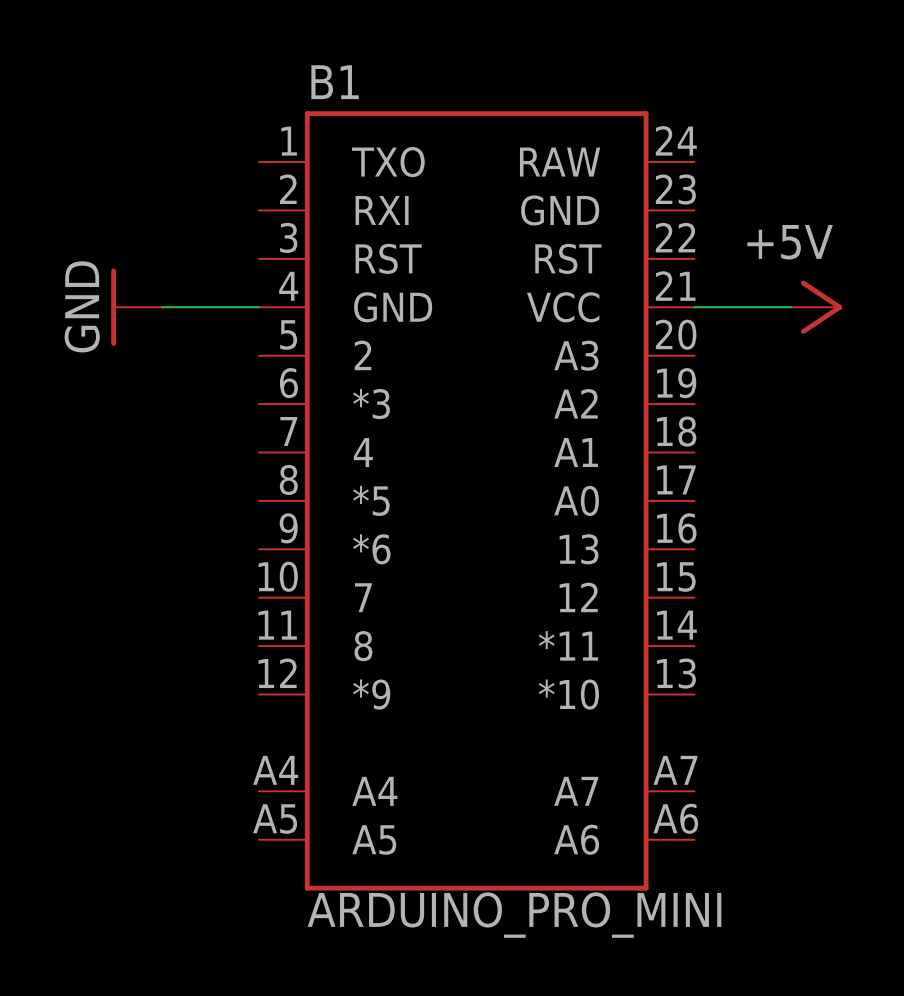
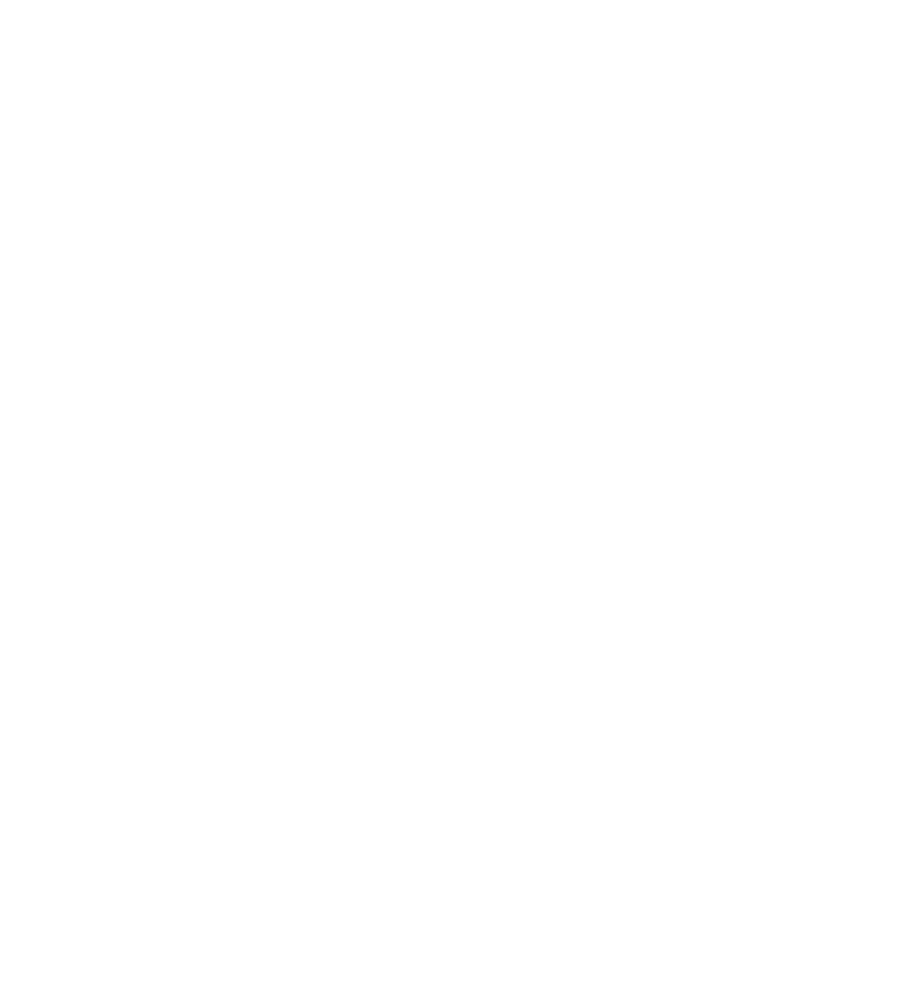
power symbol: GND (136, 307) -> none
wire: (162, 307) (258, 307) -> none
wire: (694, 307) (791, 307) -> none
power symbol: +5V (816, 307) -> none
B1: ARDUINO_PRO_MINI (476, 500) -> none

